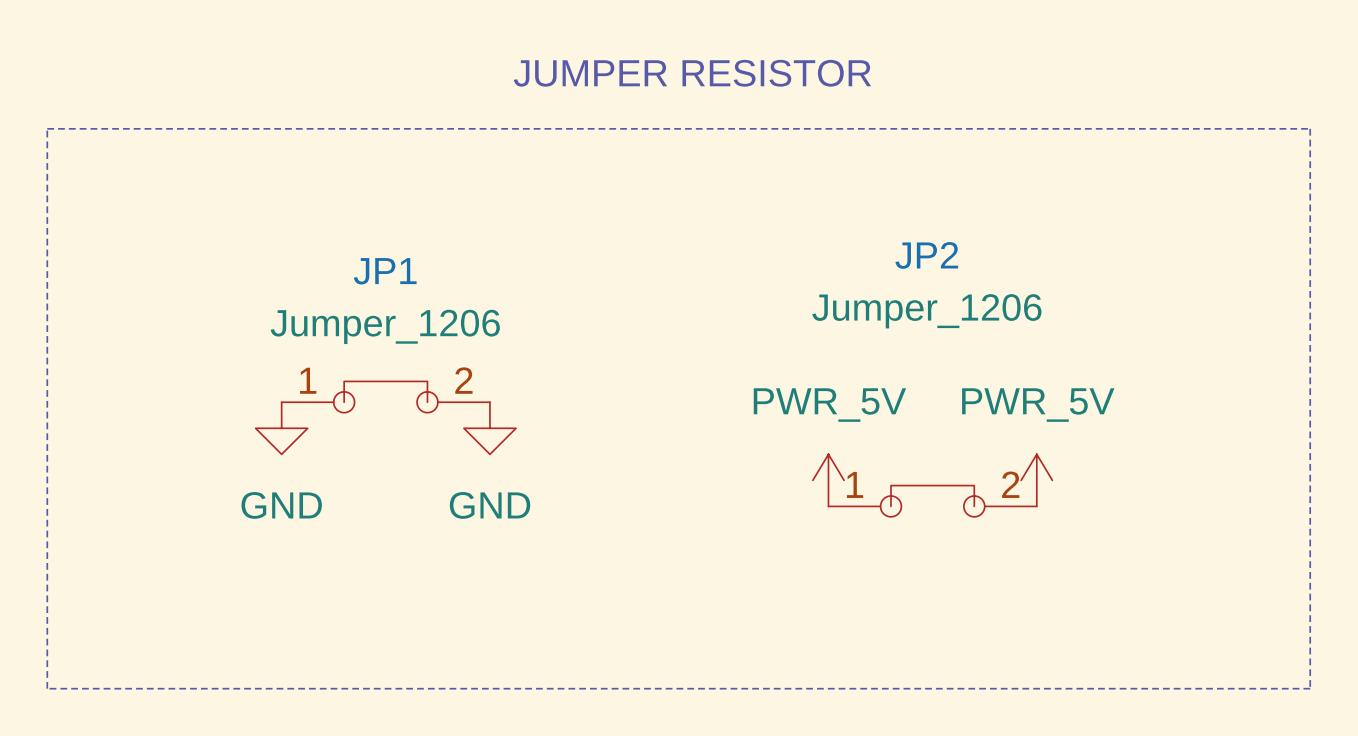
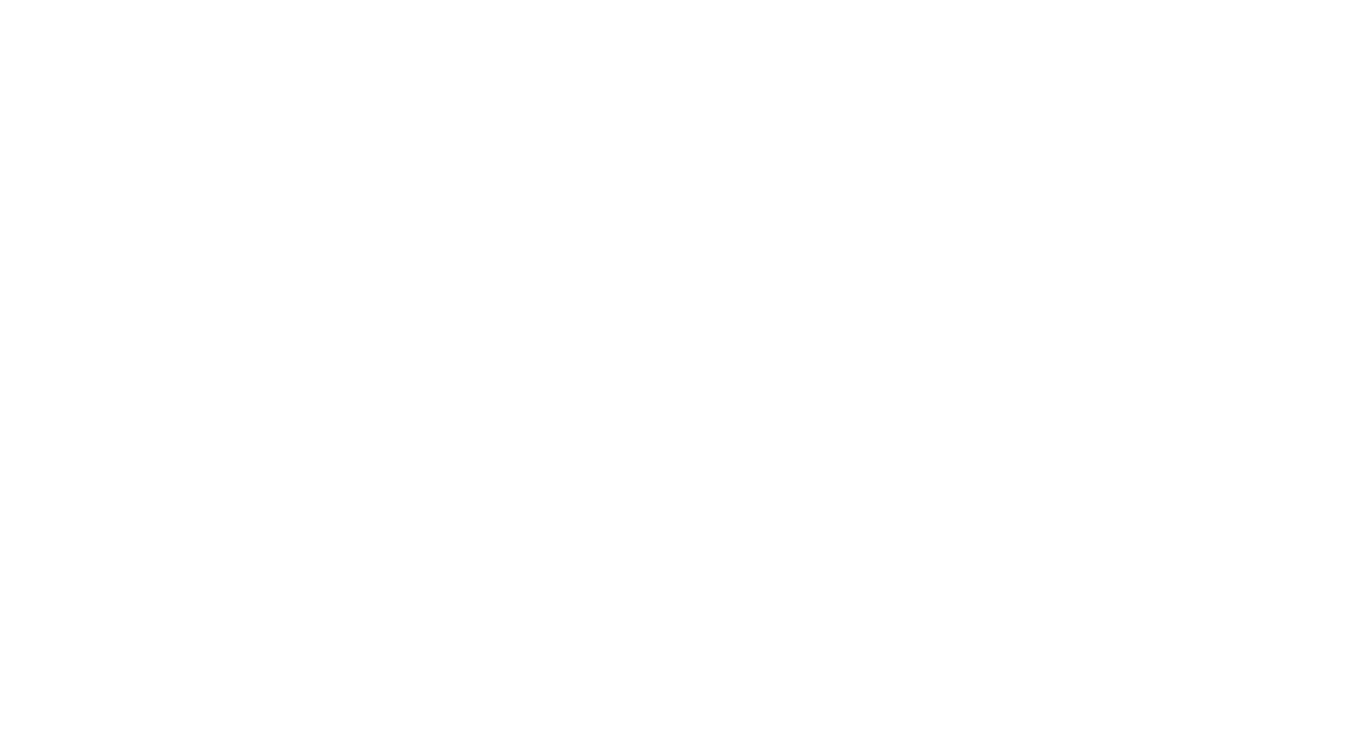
text: JUMPER RESISTOR (692, 73) -> none
line: (47, 128) (1310, 128) (1310, 688) (47, 688) (47, 128) -> none
JP1: Jumper_1206 (385, 397) -> none
power symbol: GND (281, 428) -> none
power symbol: GND (489, 428) -> none
power symbol: PWR_5V (828, 480) -> none
power symbol: PWR_5V (1036, 480) -> none
JP2: Jumper_1206 (932, 501) -> none

